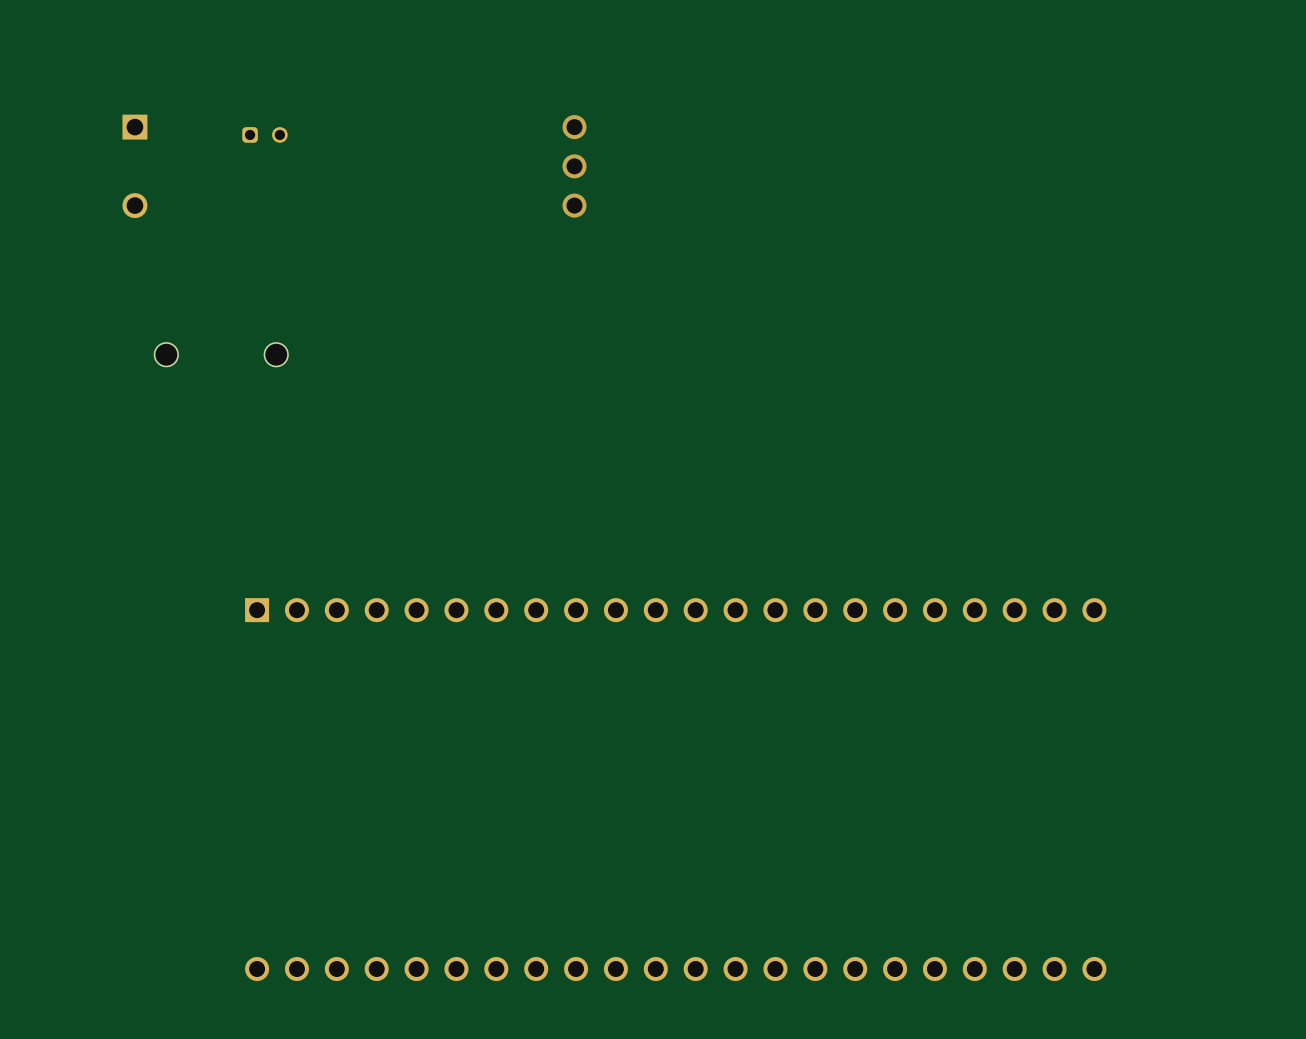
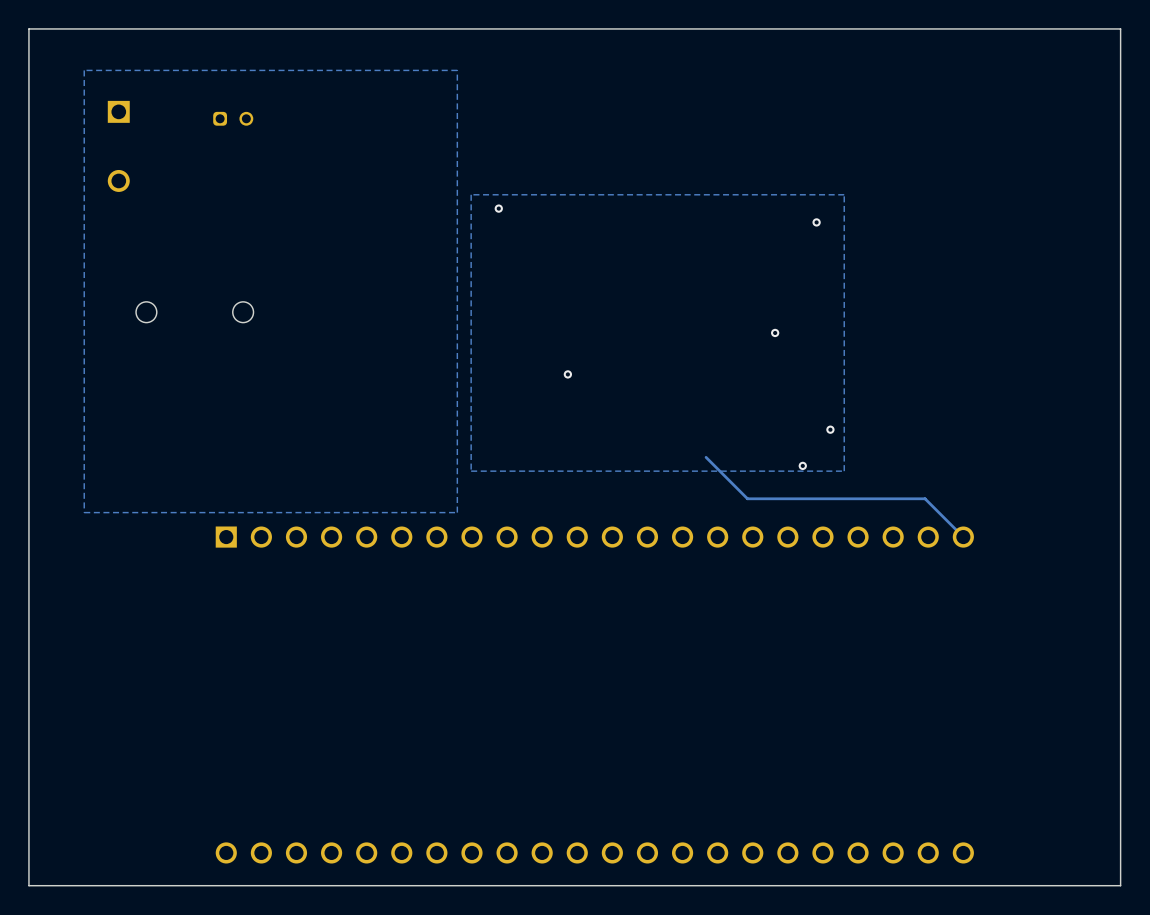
board edge: none -> (1120, 28) (28, 28) (28, 885) (1120, 885) (1120, 28)
zone outline: none -> (457, 70) (84, 70) (84, 512) (457, 512) (457, 70)
via: (574, 127) -> none
via: (574, 166) -> none
via: (574, 205) -> none
zone outline: none -> (844, 194) (471, 194) (471, 471) (844, 471) (844, 194)
via: none -> (498, 208)
via: none -> (816, 222)
via: none -> (775, 332)
via: none -> (567, 374)
via: none -> (830, 429)
track: none -> (706, 457) (747, 498) (925, 498) (963, 537)
via: none -> (802, 465)

